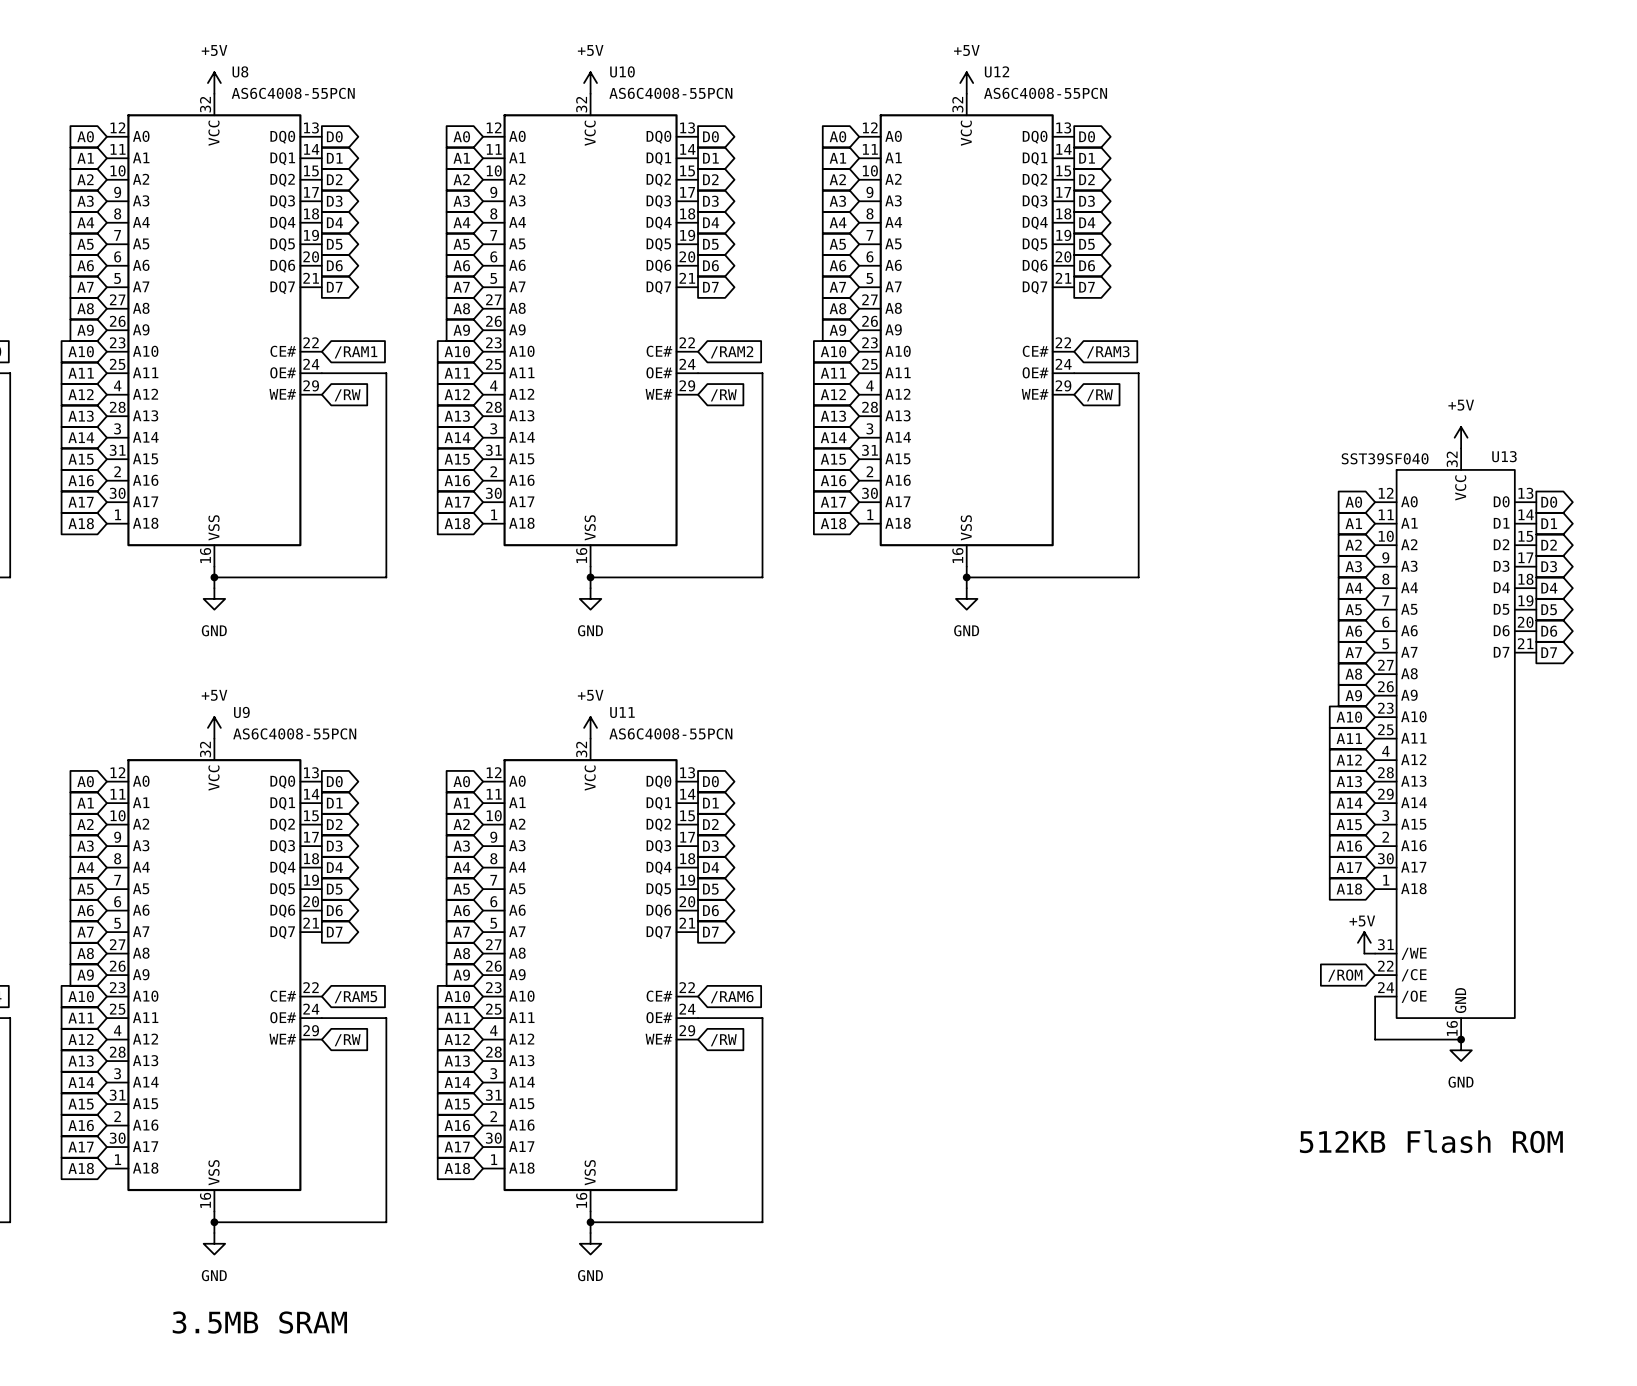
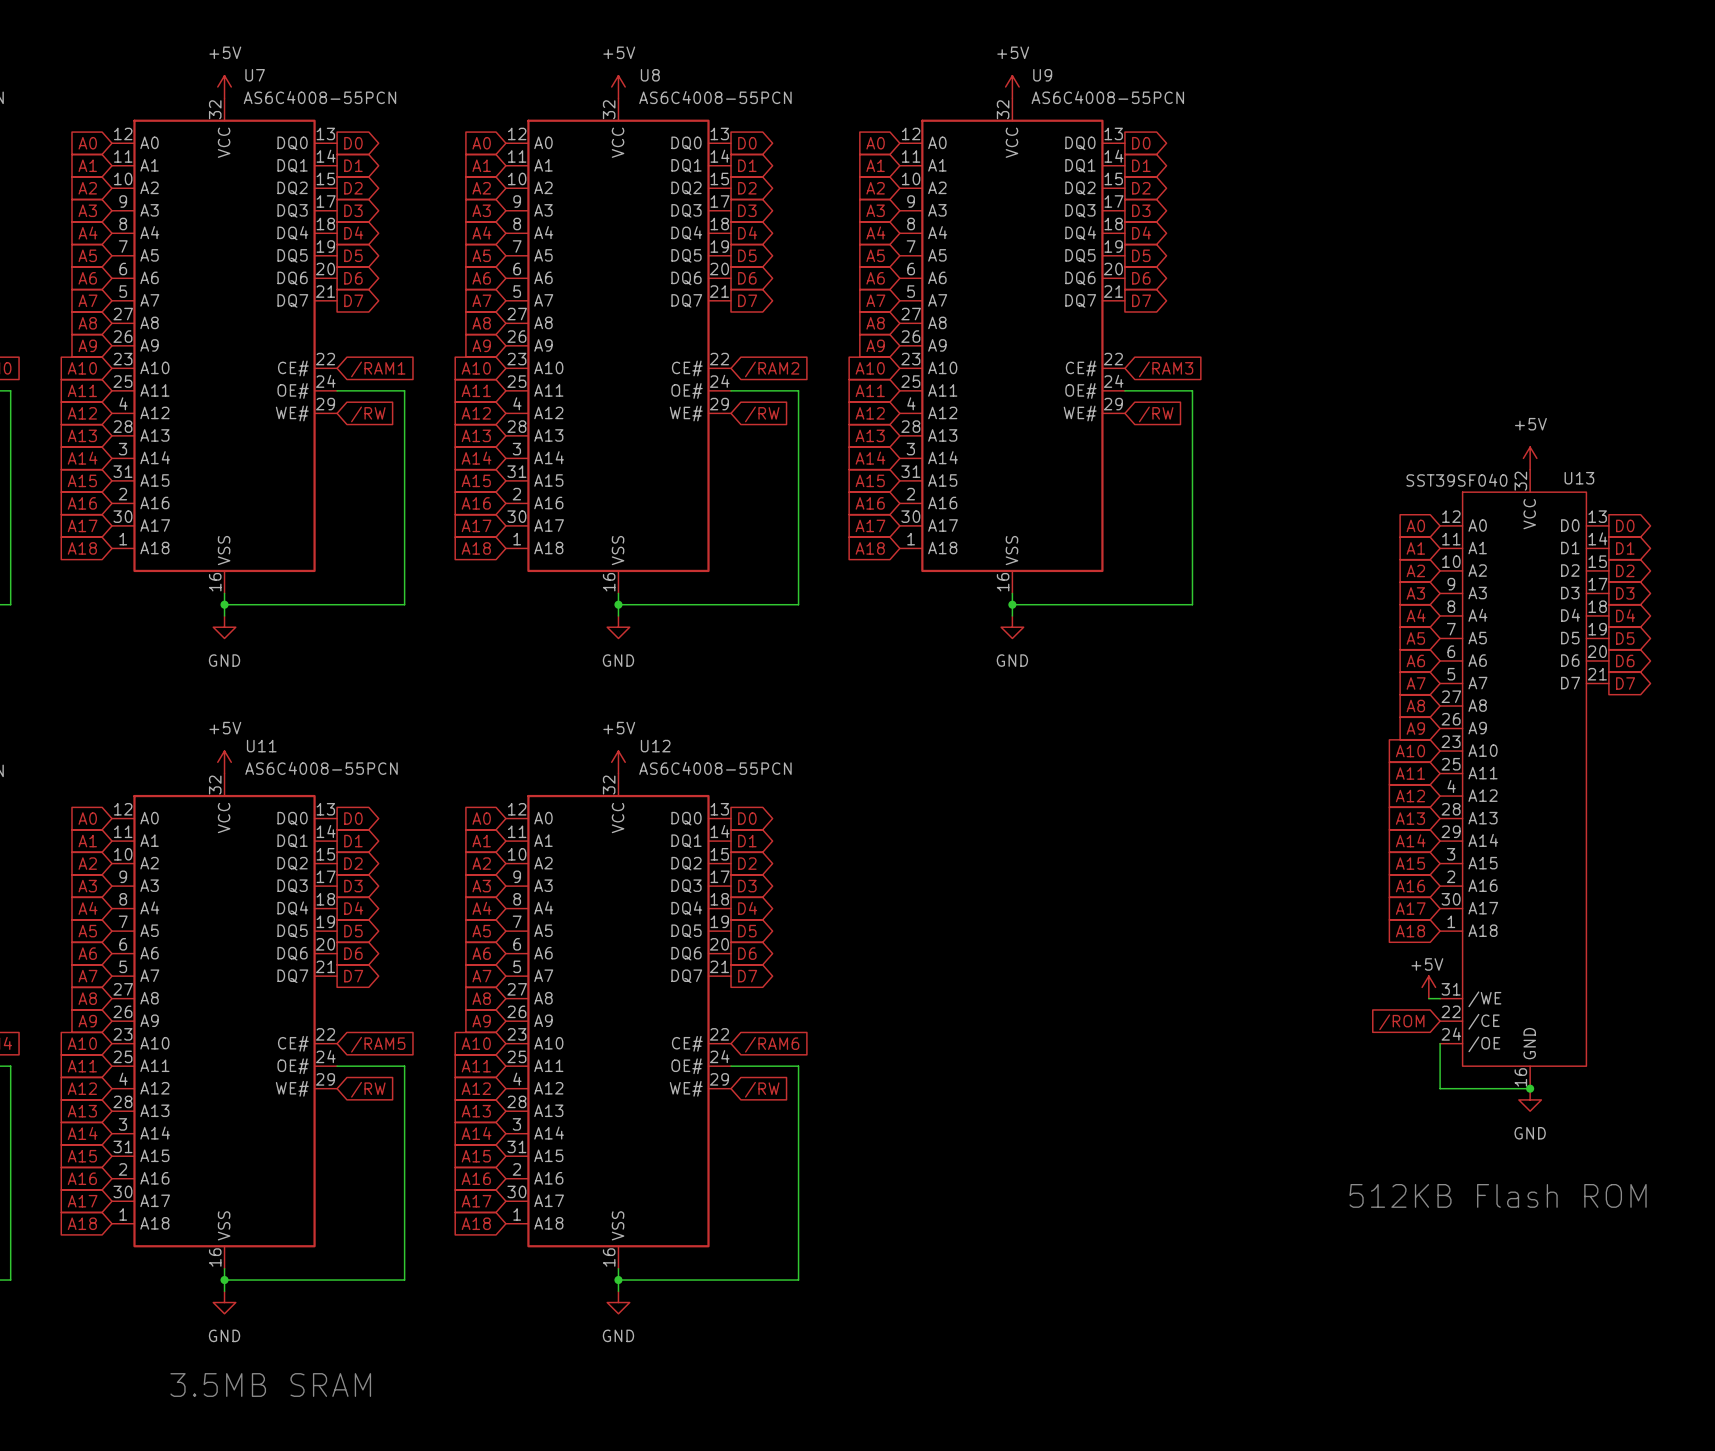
U8 name: U8 (240, 71) -> U7 (255, 75)
U10 name: U10 (622, 71) -> U8 (650, 75)
U12 name: U12 (997, 71) -> U9 (1042, 75)
U9 name: U9 (241, 712) -> U11 (261, 746)
U11 name: U11 (622, 712) -> U12 (655, 746)

